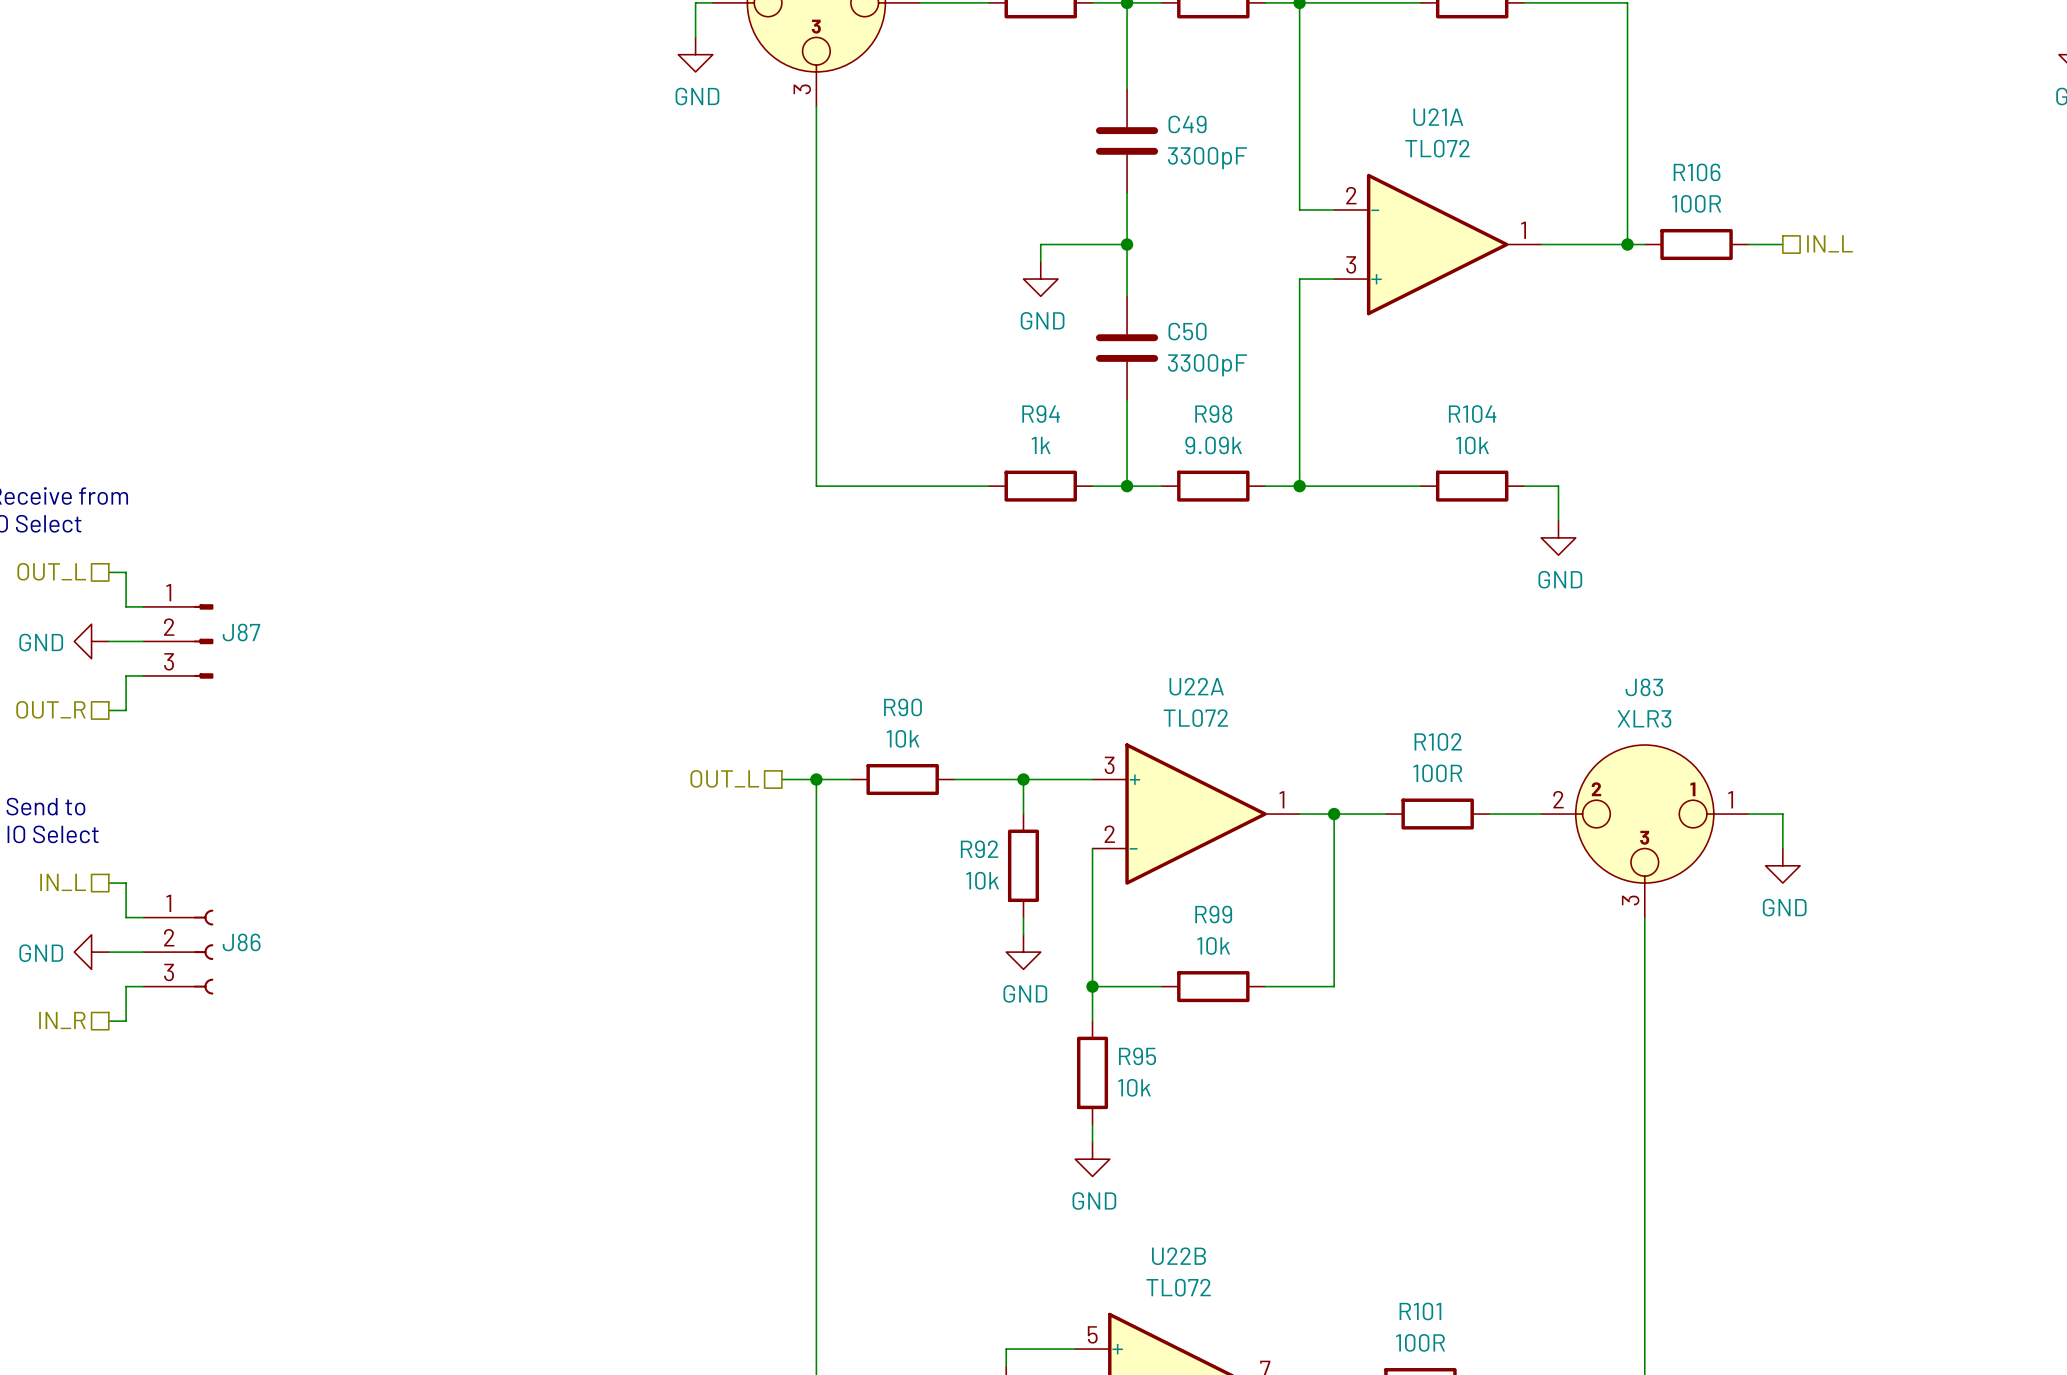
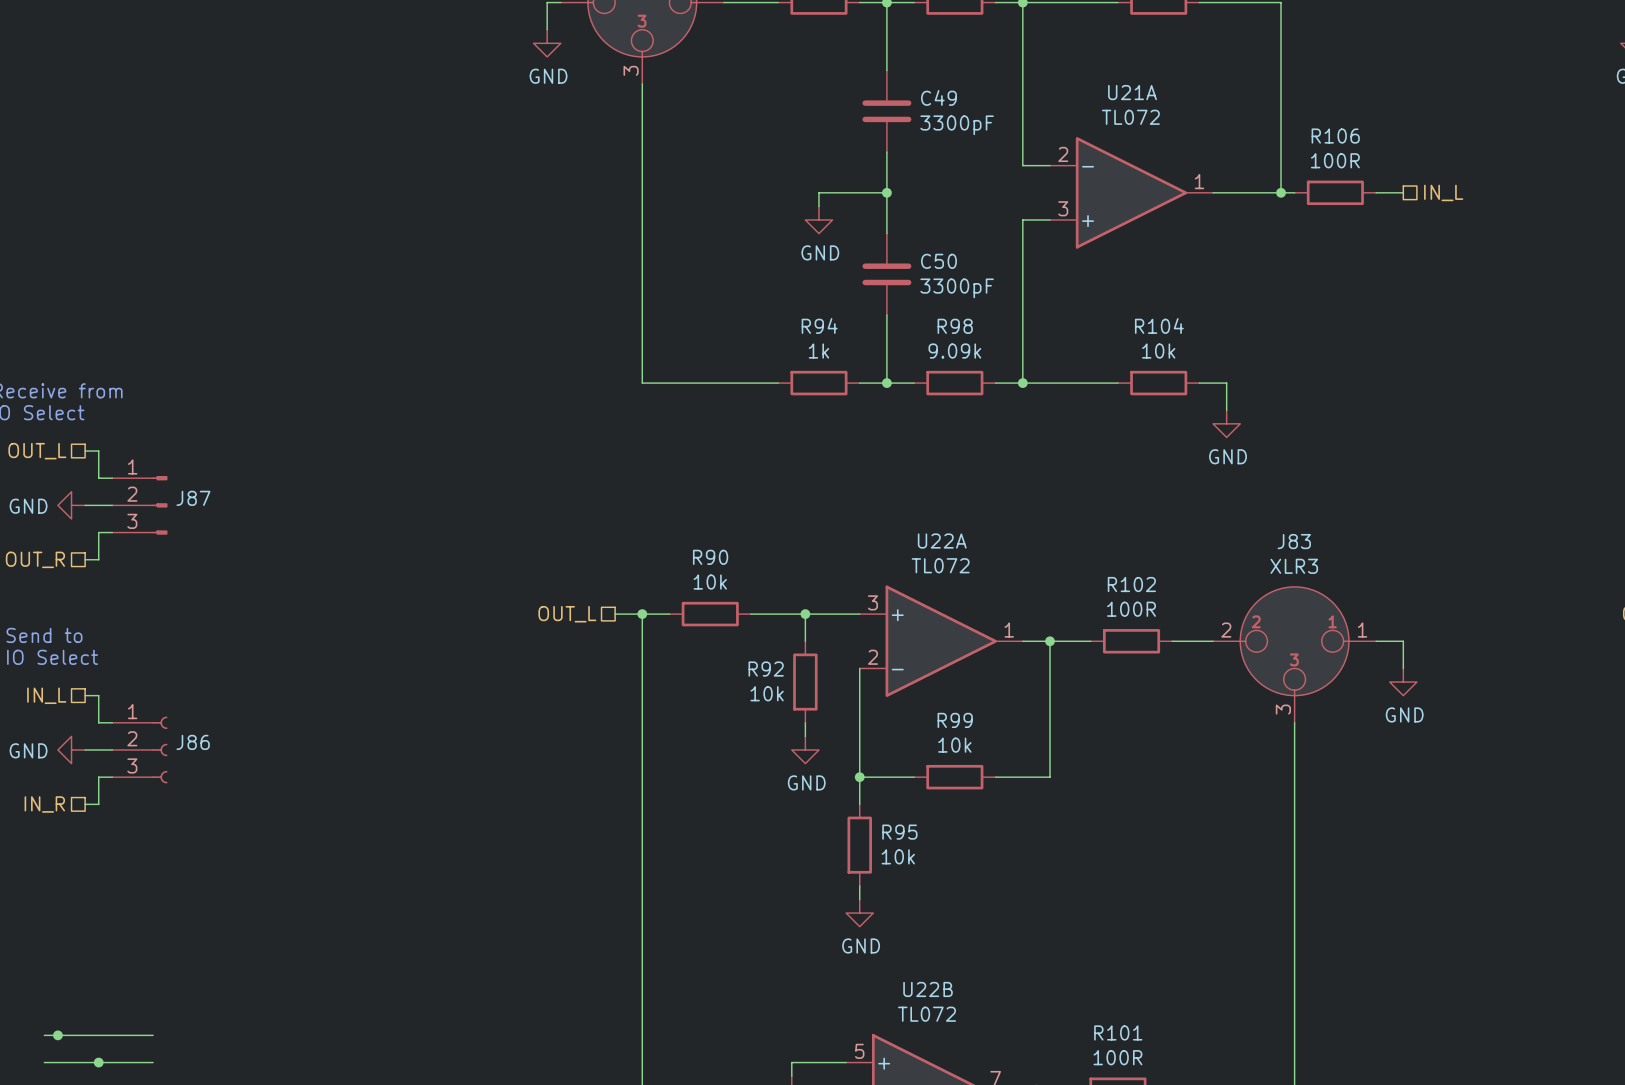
wire: none -> (44, 1035) (153, 1035)
junction: none -> (57, 1035)
wire: none -> (44, 1062) (153, 1062)
junction: none -> (98, 1062)

